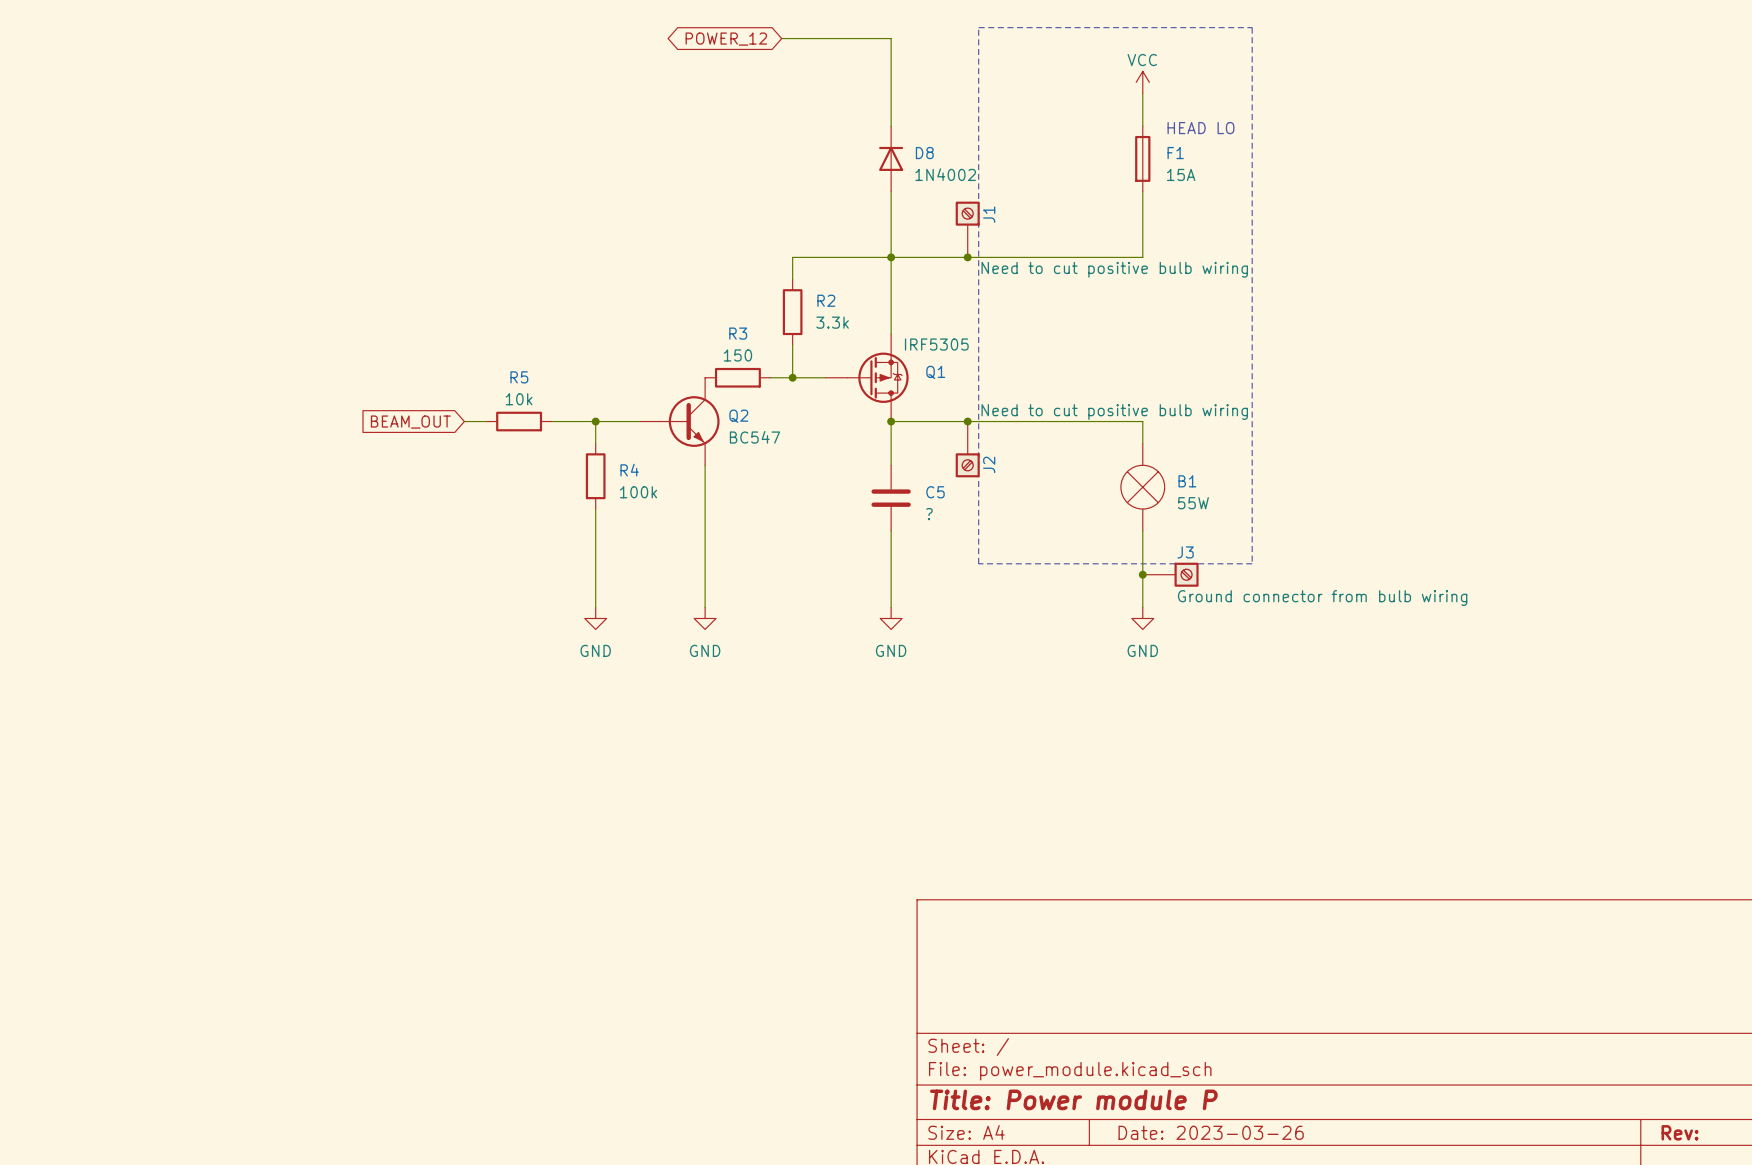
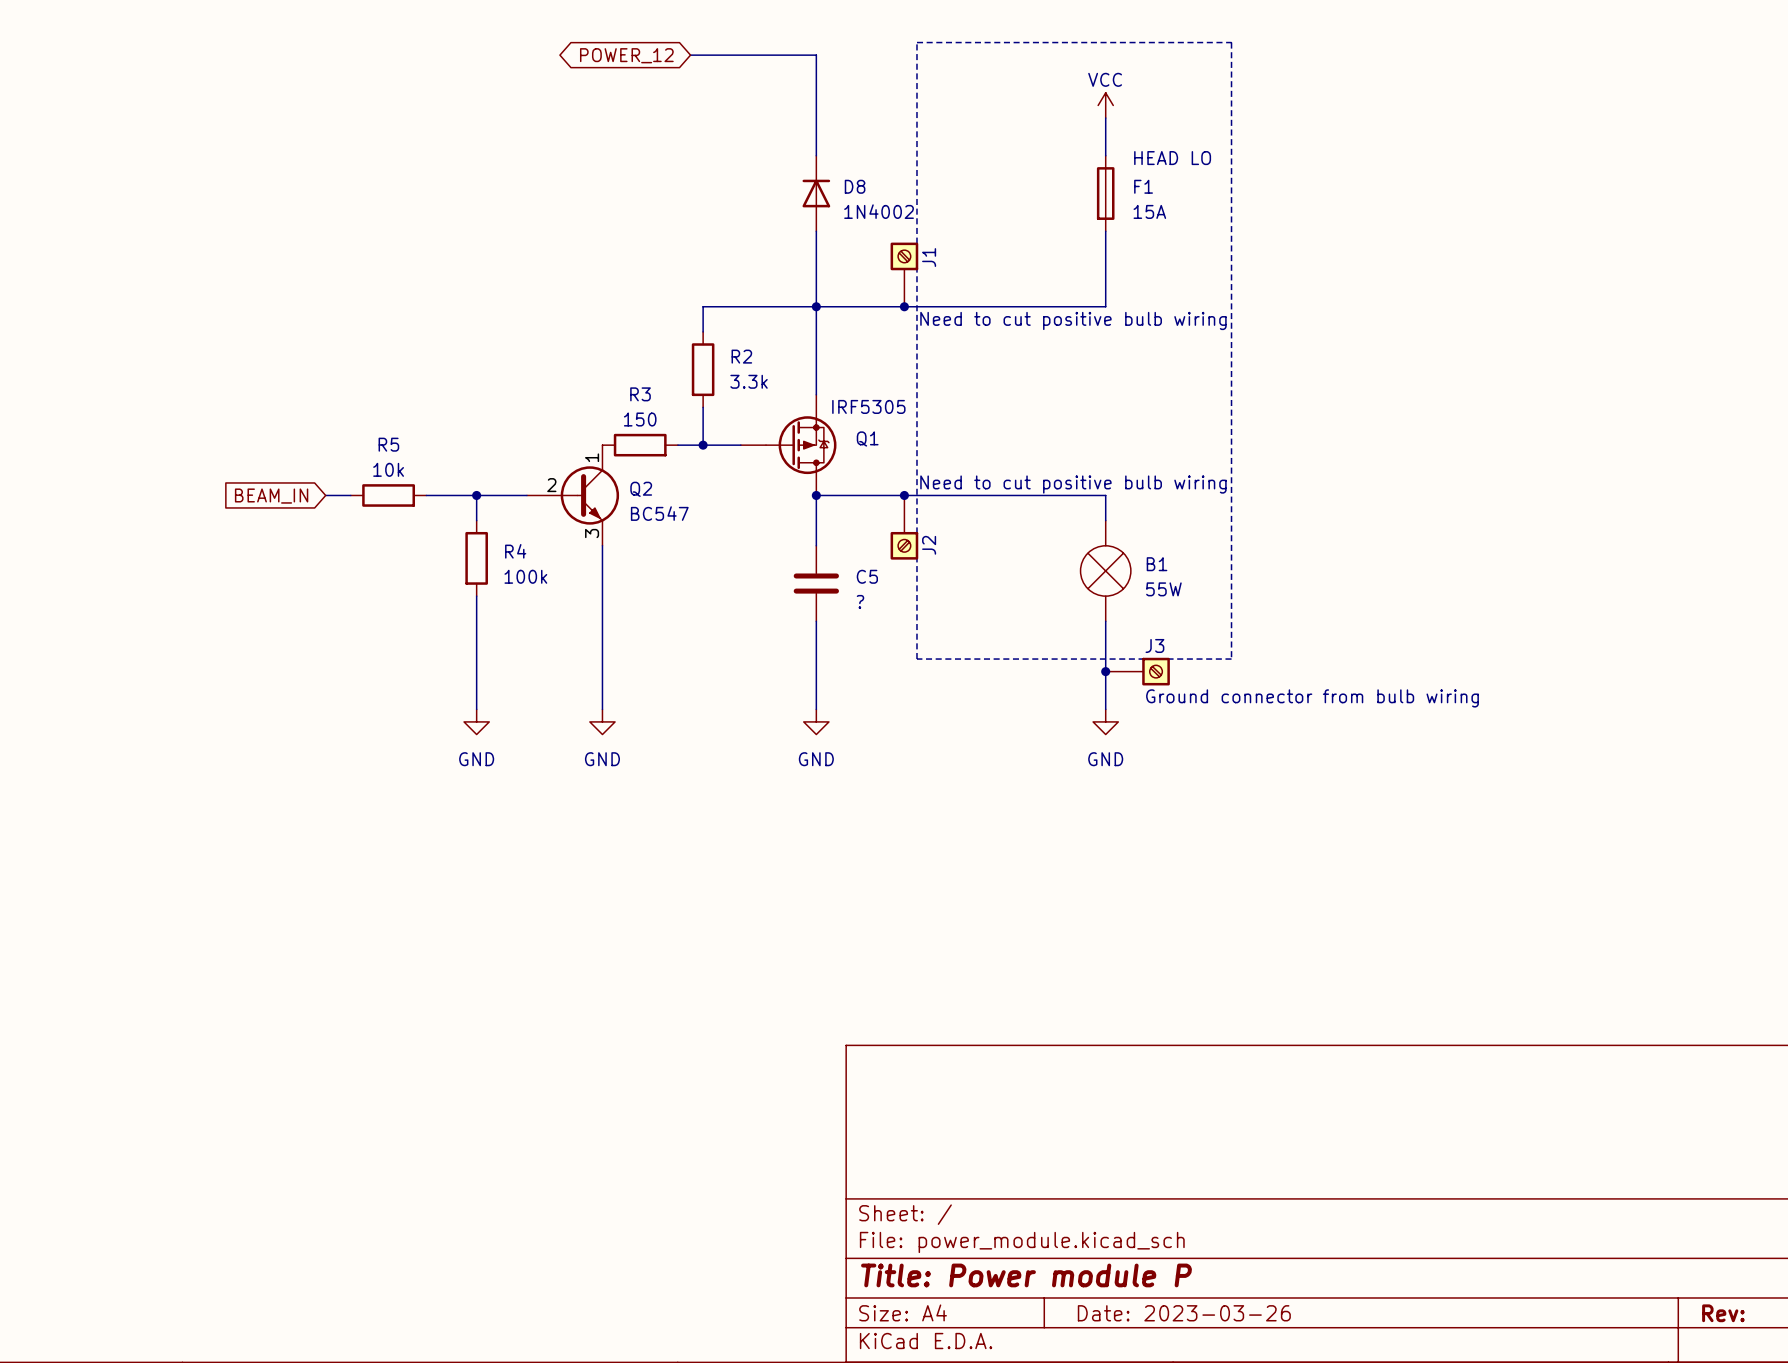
Q2 pin number: none -> 1 (592, 457)
Q2 pin number: none -> 2 (551, 485)
global label: BEAM_OUT (410, 422) -> BEAM_IN (271, 496)
Q2 pin number: none -> 3 (592, 533)

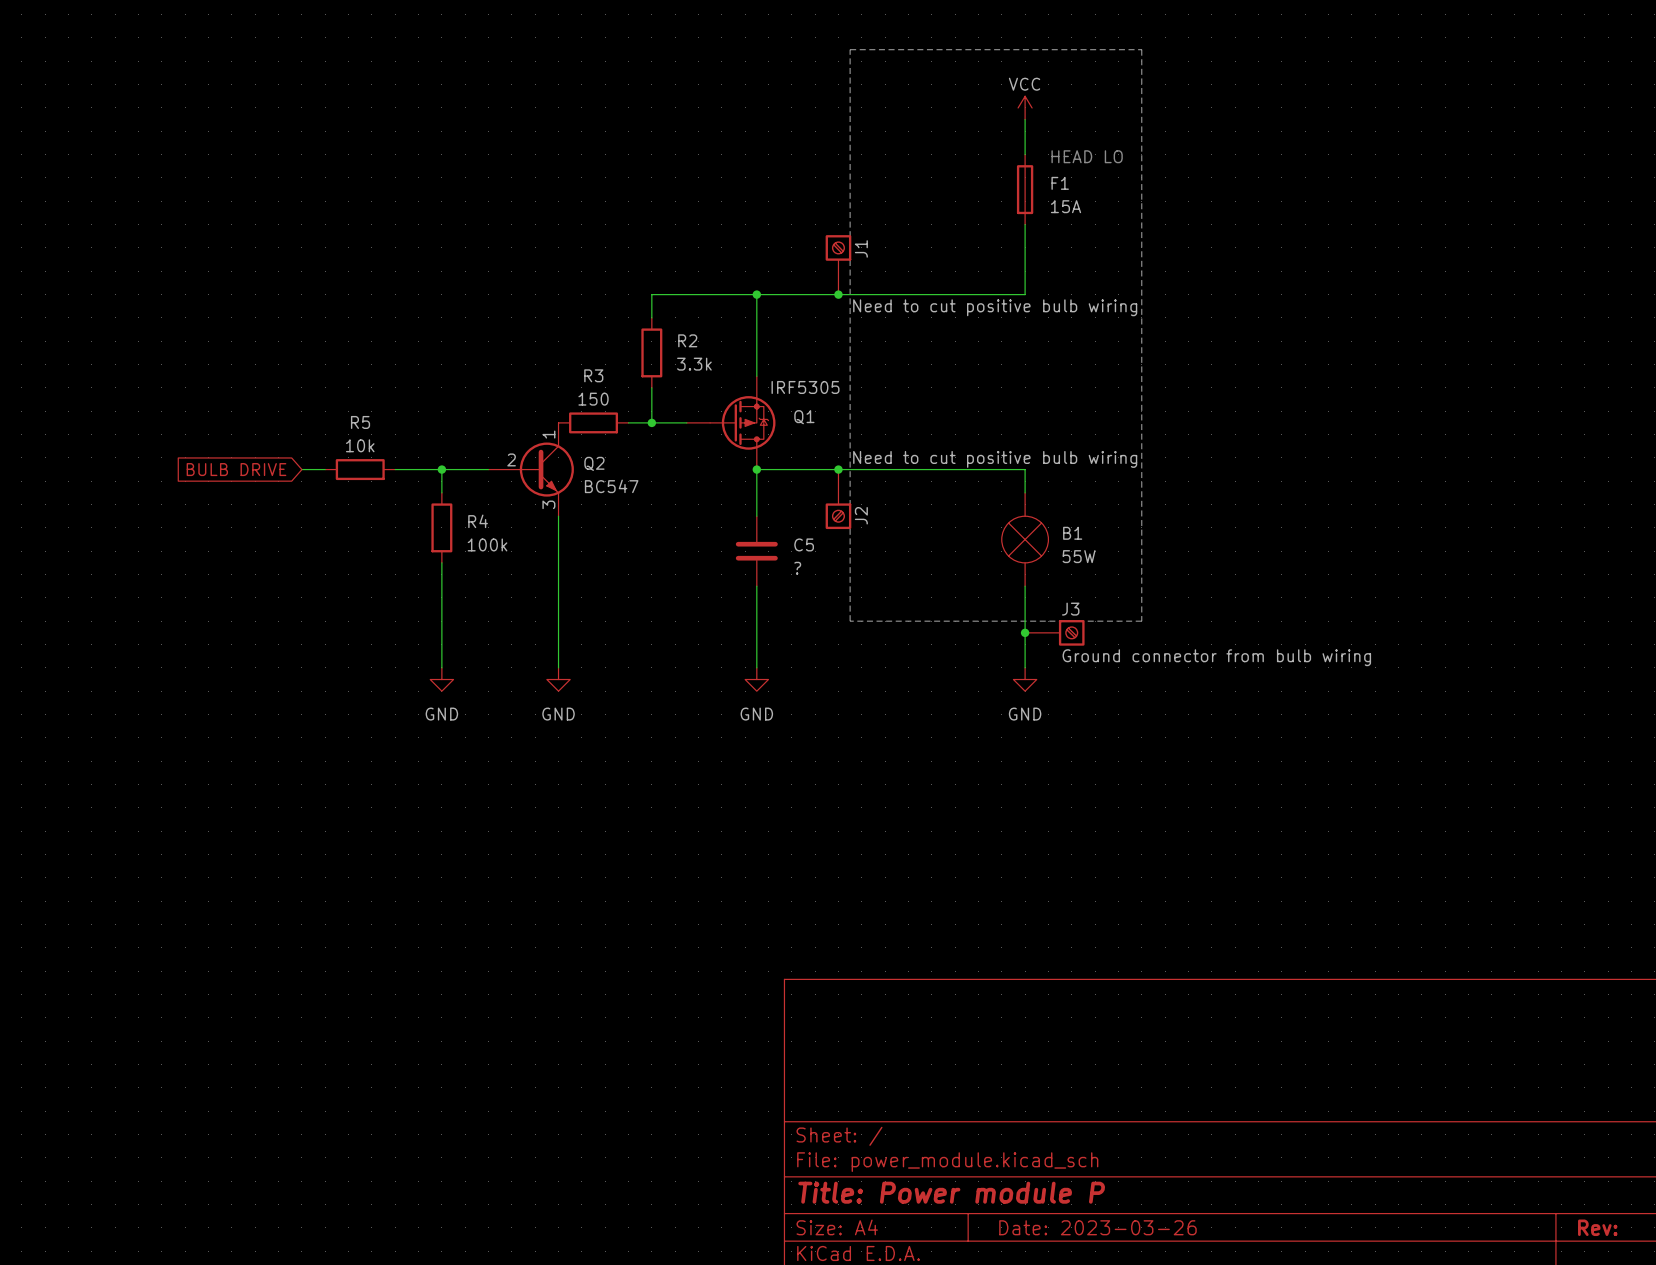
global label: POWER_12 (626, 55) -> none
wire: (690, 55) (816, 55) (816, 155) -> none
D8: 1N4002 (816, 193) -> none
wire: (816, 231) (816, 306) -> none
global label: BEAM_IN (271, 496) -> BULB DRIVE (236, 469)

